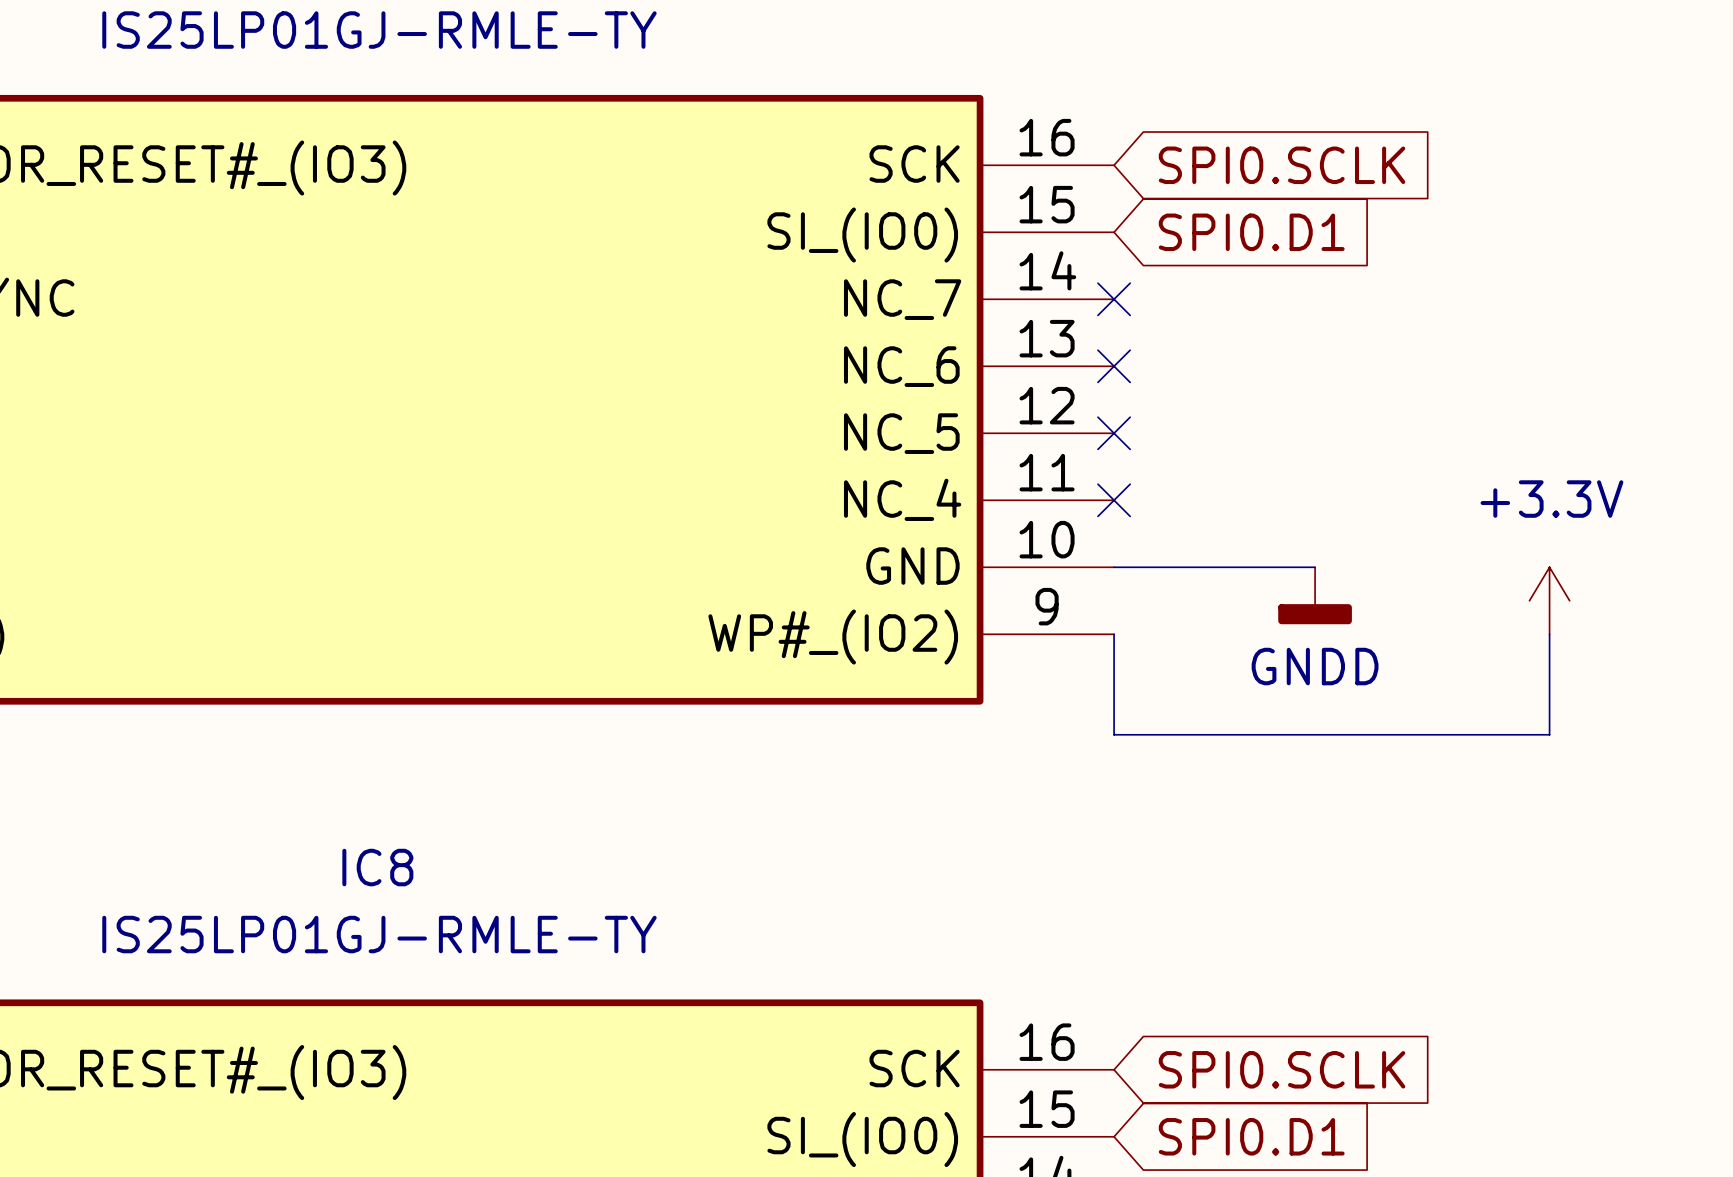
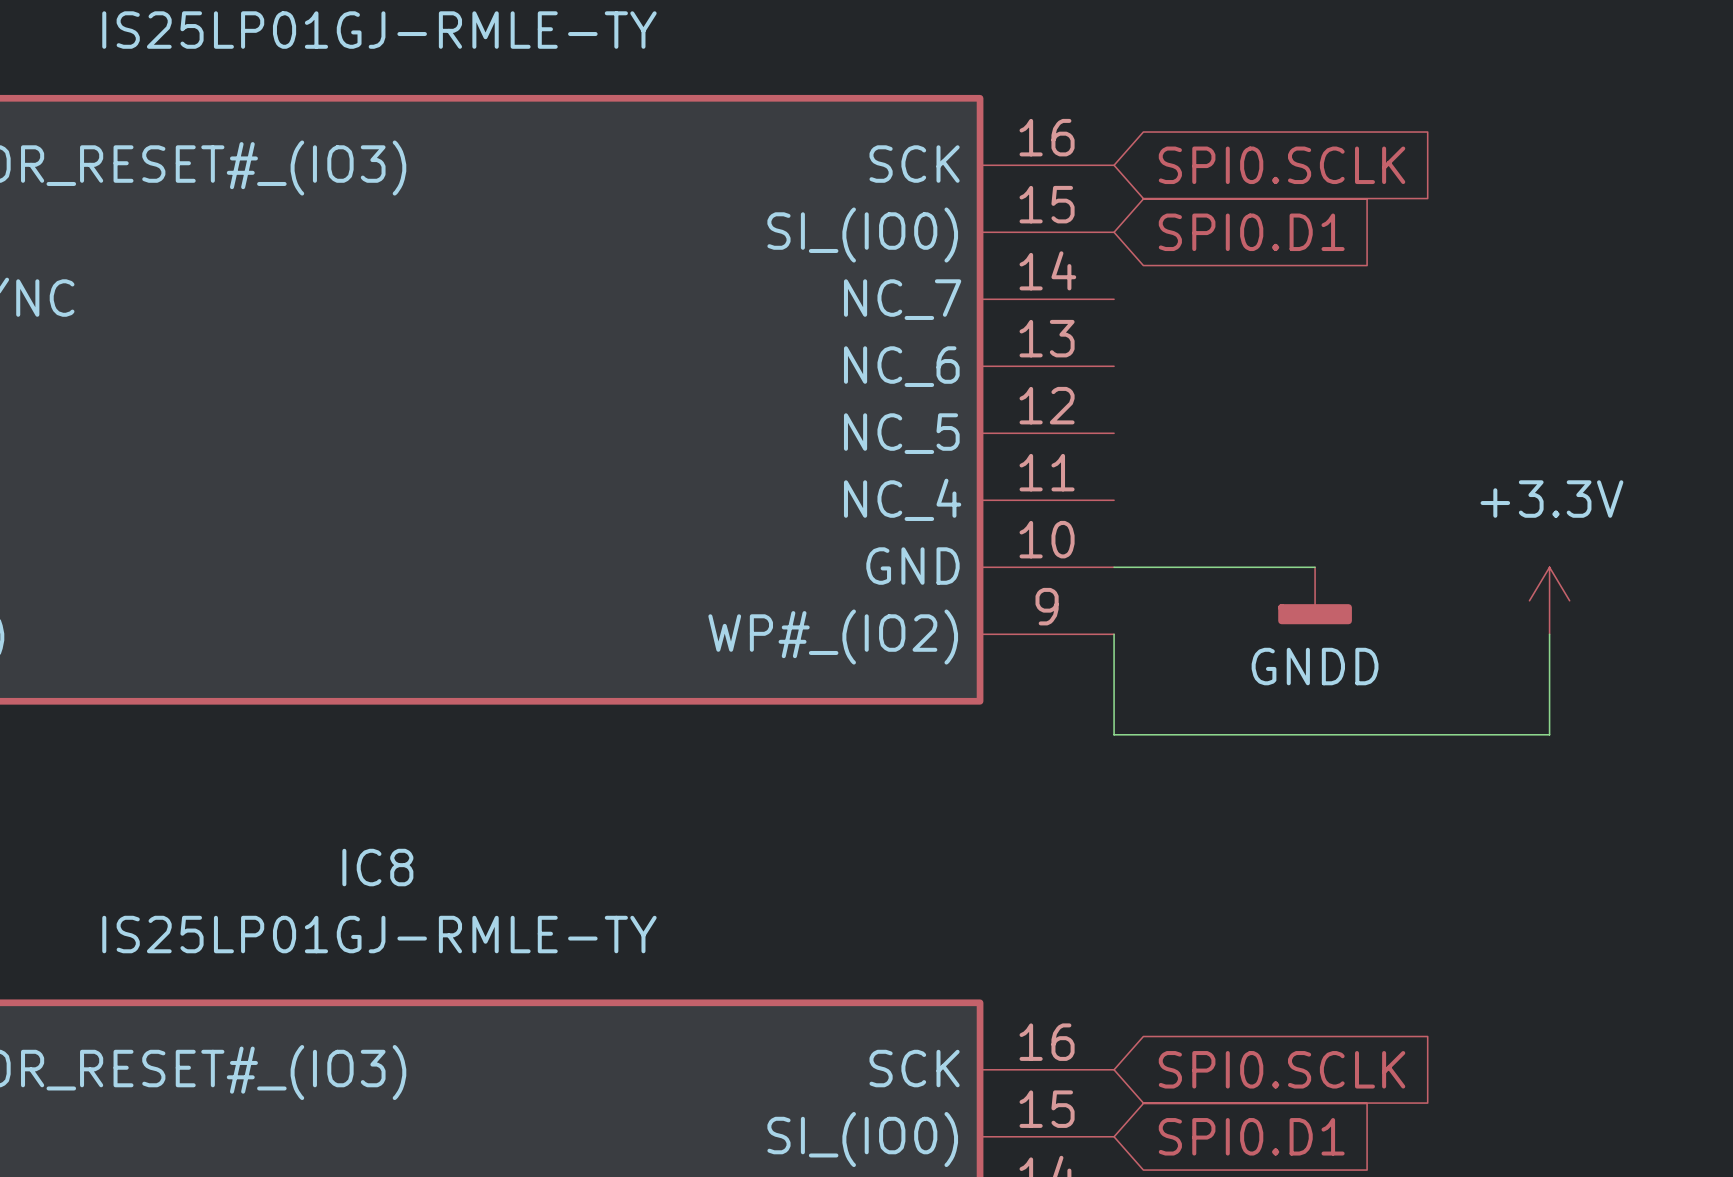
no-connect mark: (1114, 299) -> none
no-connect mark: (1114, 366) -> none
no-connect mark: (1114, 433) -> none
no-connect mark: (1114, 500) -> none

